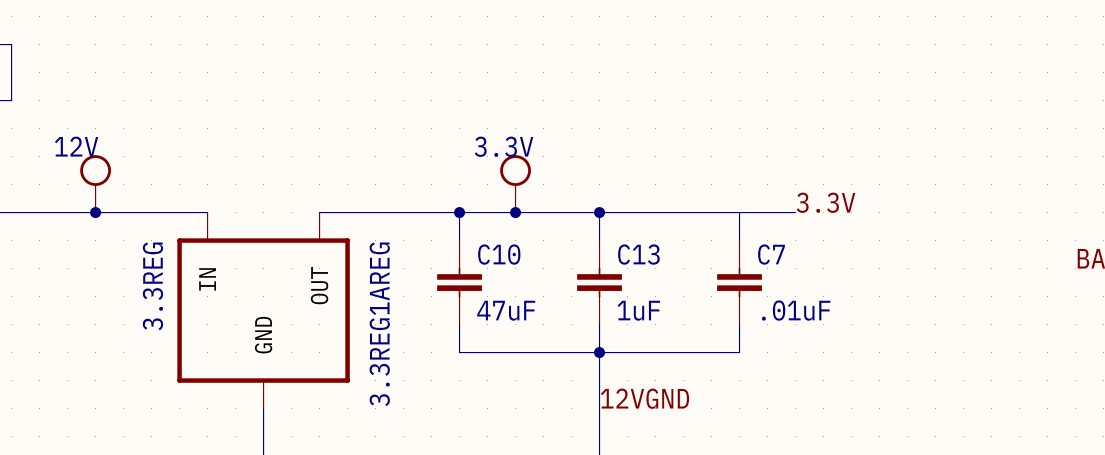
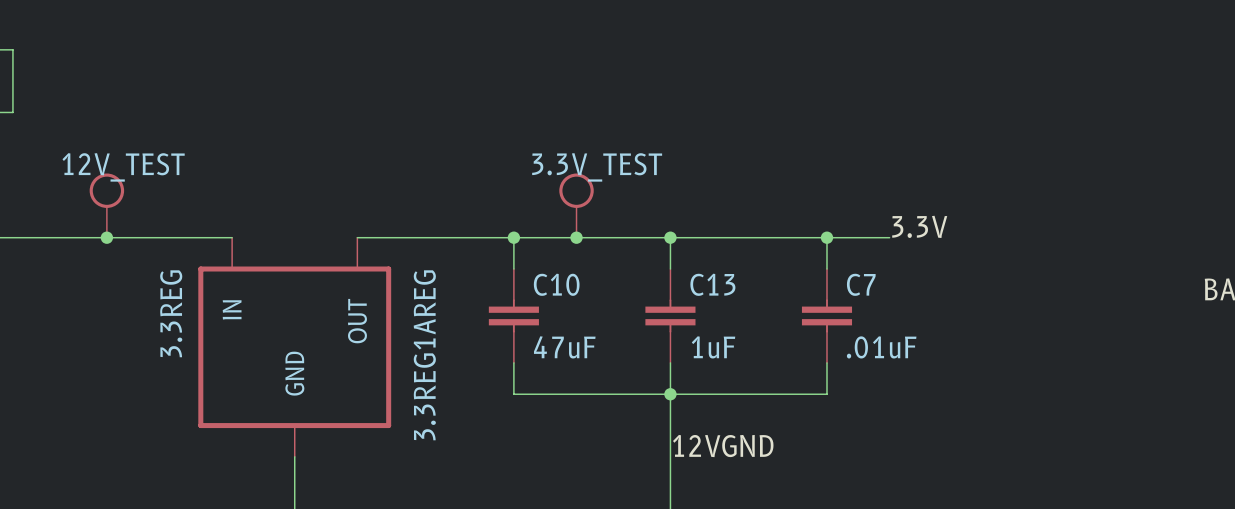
12V name: 12V (76, 146) -> 12V_TEST (123, 167)
3.3V name: 3.3V (504, 146) -> 3.3V_TEST (597, 167)
junction: none -> (826, 237)

